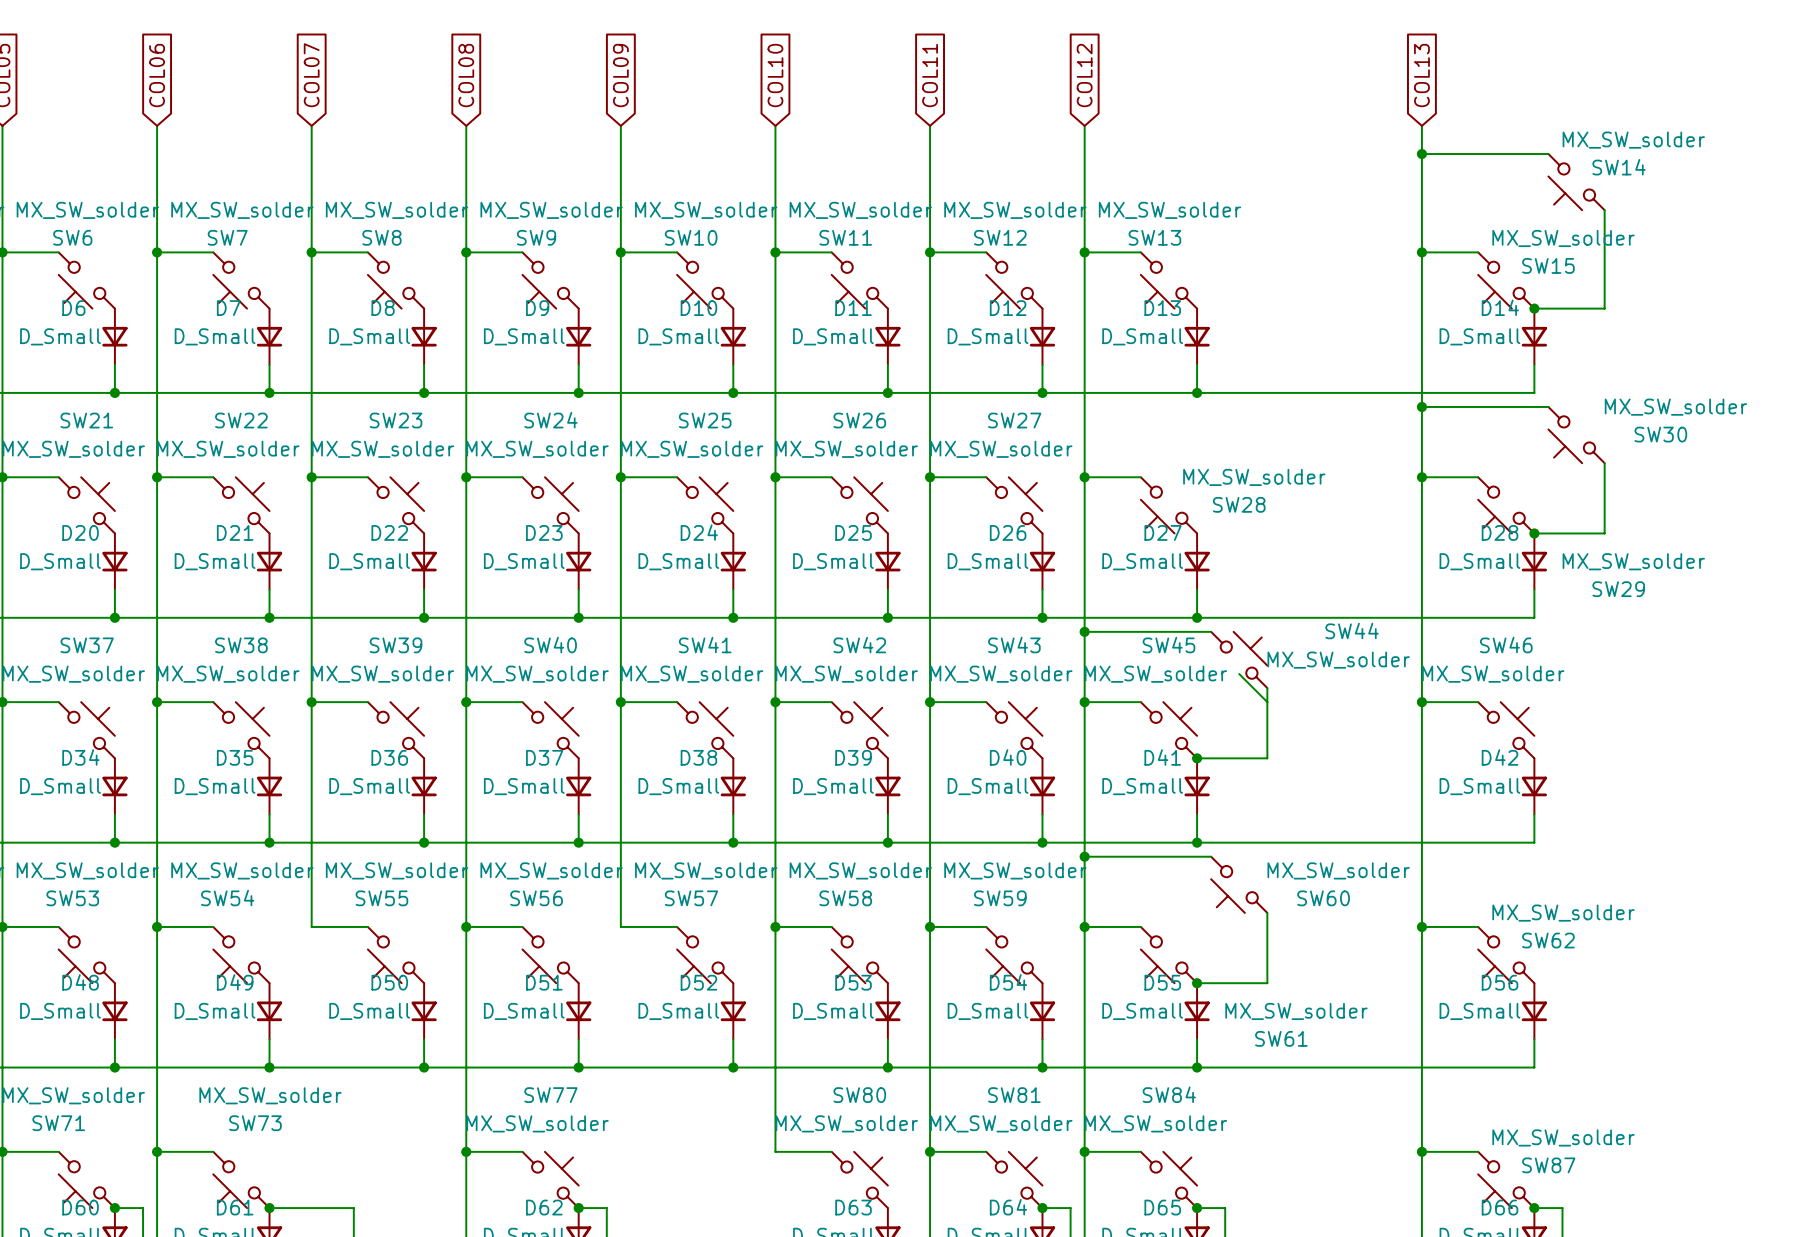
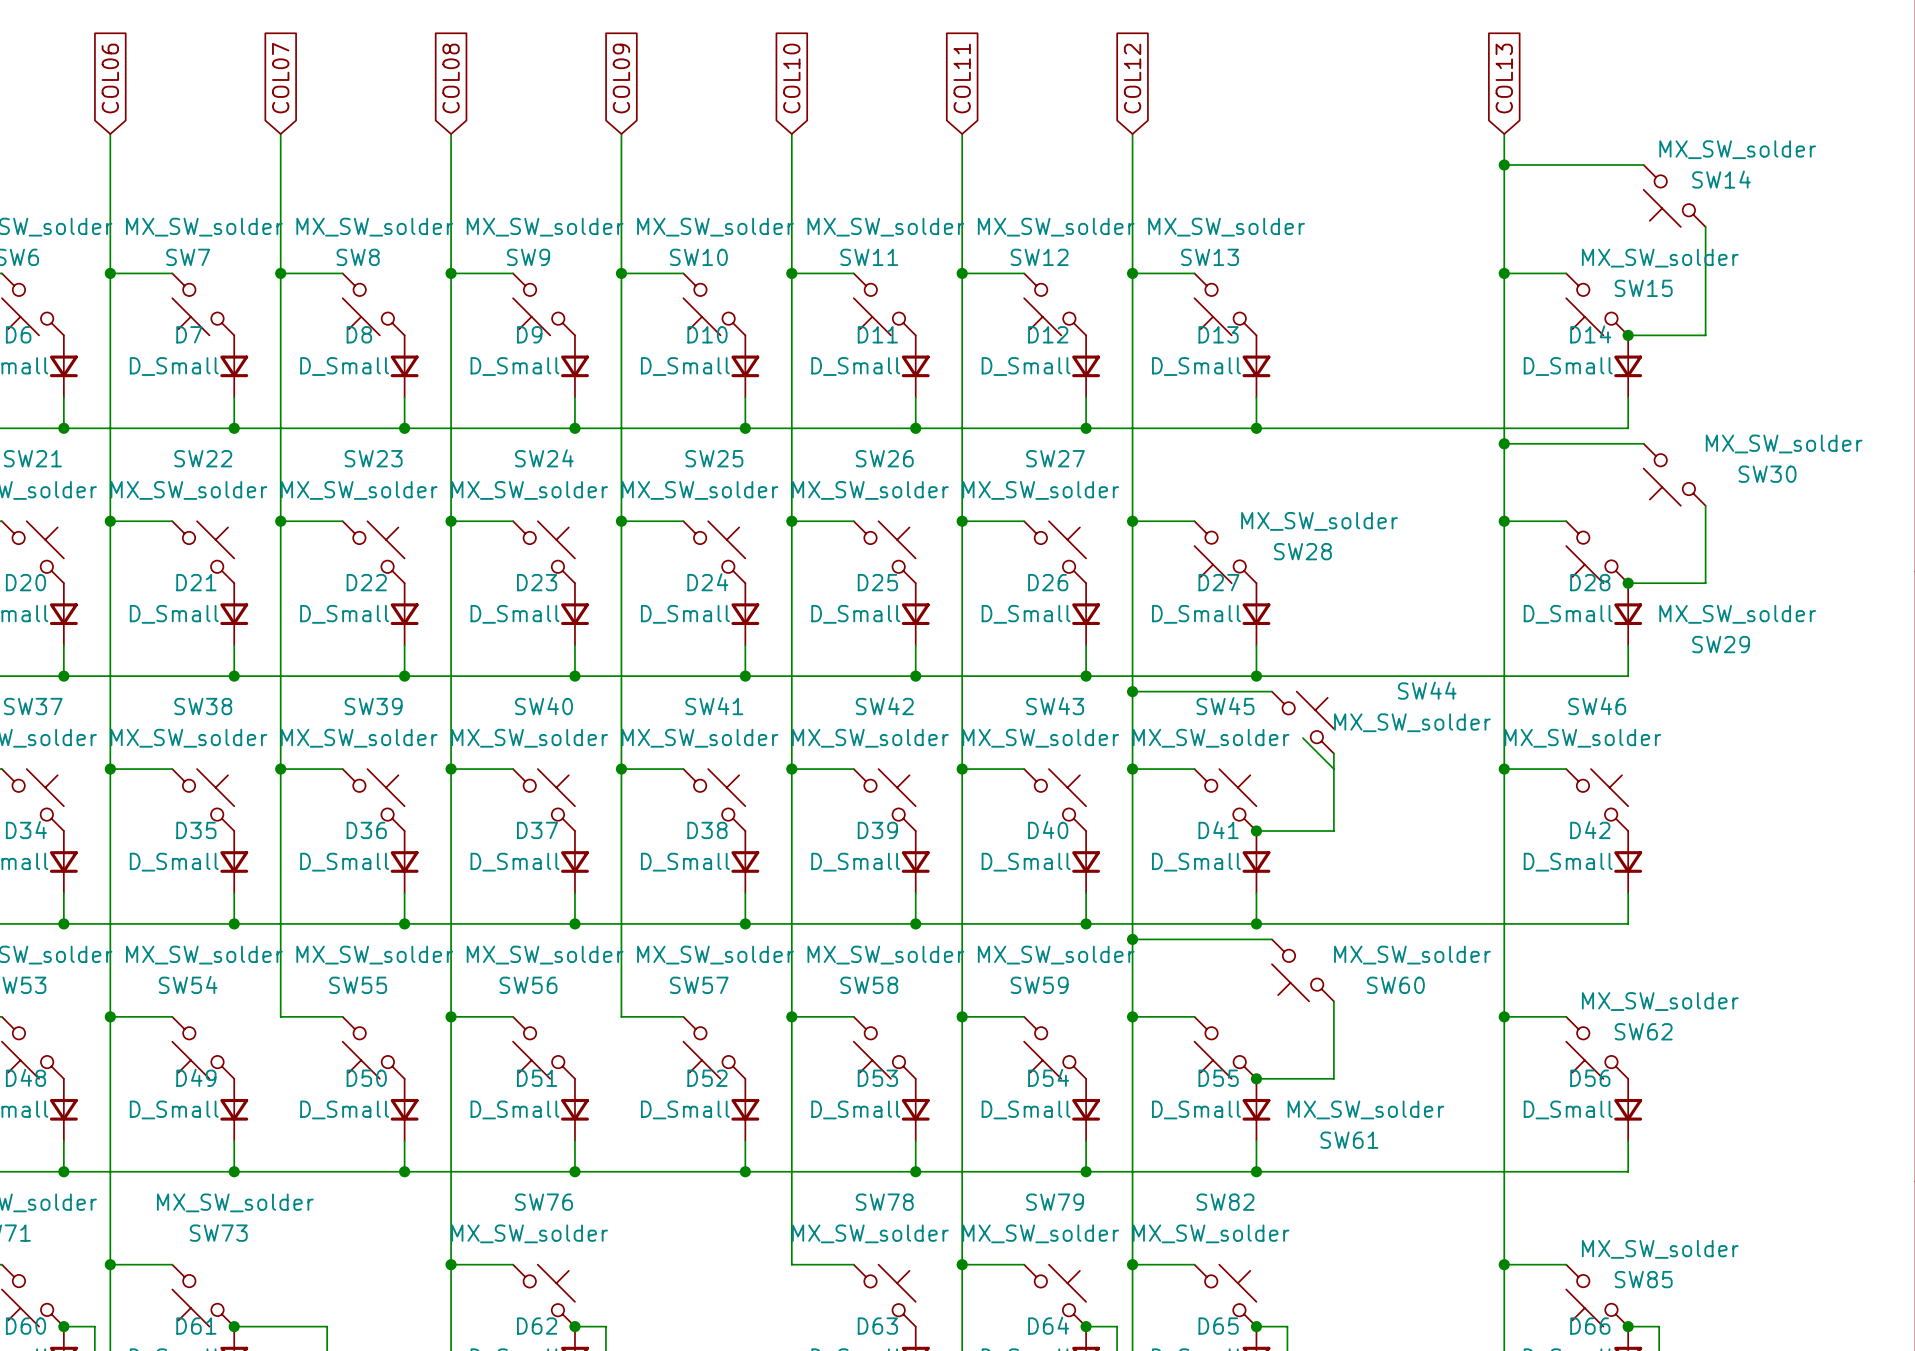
SW84 name: SW84 (1169, 1094) -> SW82 (1225, 1202)
SW77 name: SW77 (550, 1095) -> SW76 (544, 1202)
SW80 name: SW80 (859, 1095) -> SW78 (884, 1202)
SW81 name: SW81 (1014, 1095) -> SW79 (1055, 1202)
SW87 name: SW87 (1548, 1165) -> SW85 (1643, 1279)

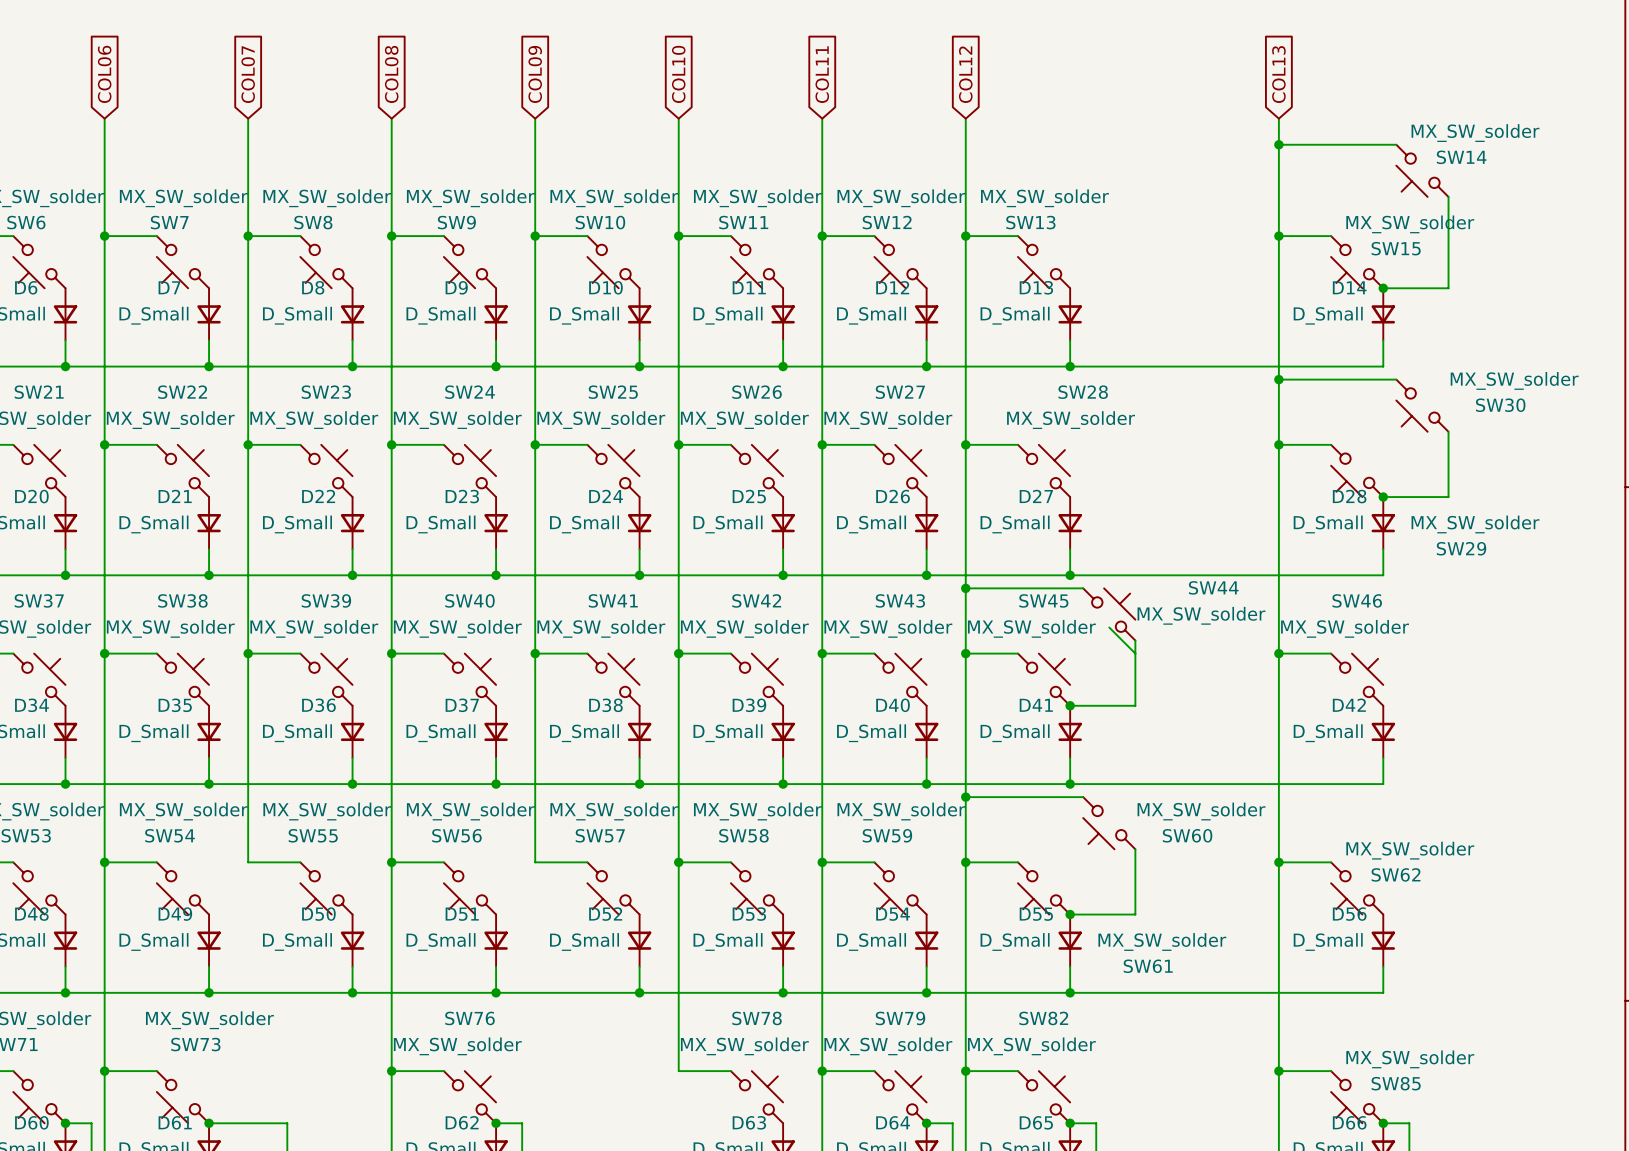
SW28 value position: MX_SW_solder (1319, 521) -> MX_SW_solder (1071, 420)
SW28 name position: SW28 (1302, 551) -> SW28 (1083, 392)
SW28 rotation: 0° (1225, 552) -> 180° (1044, 470)

